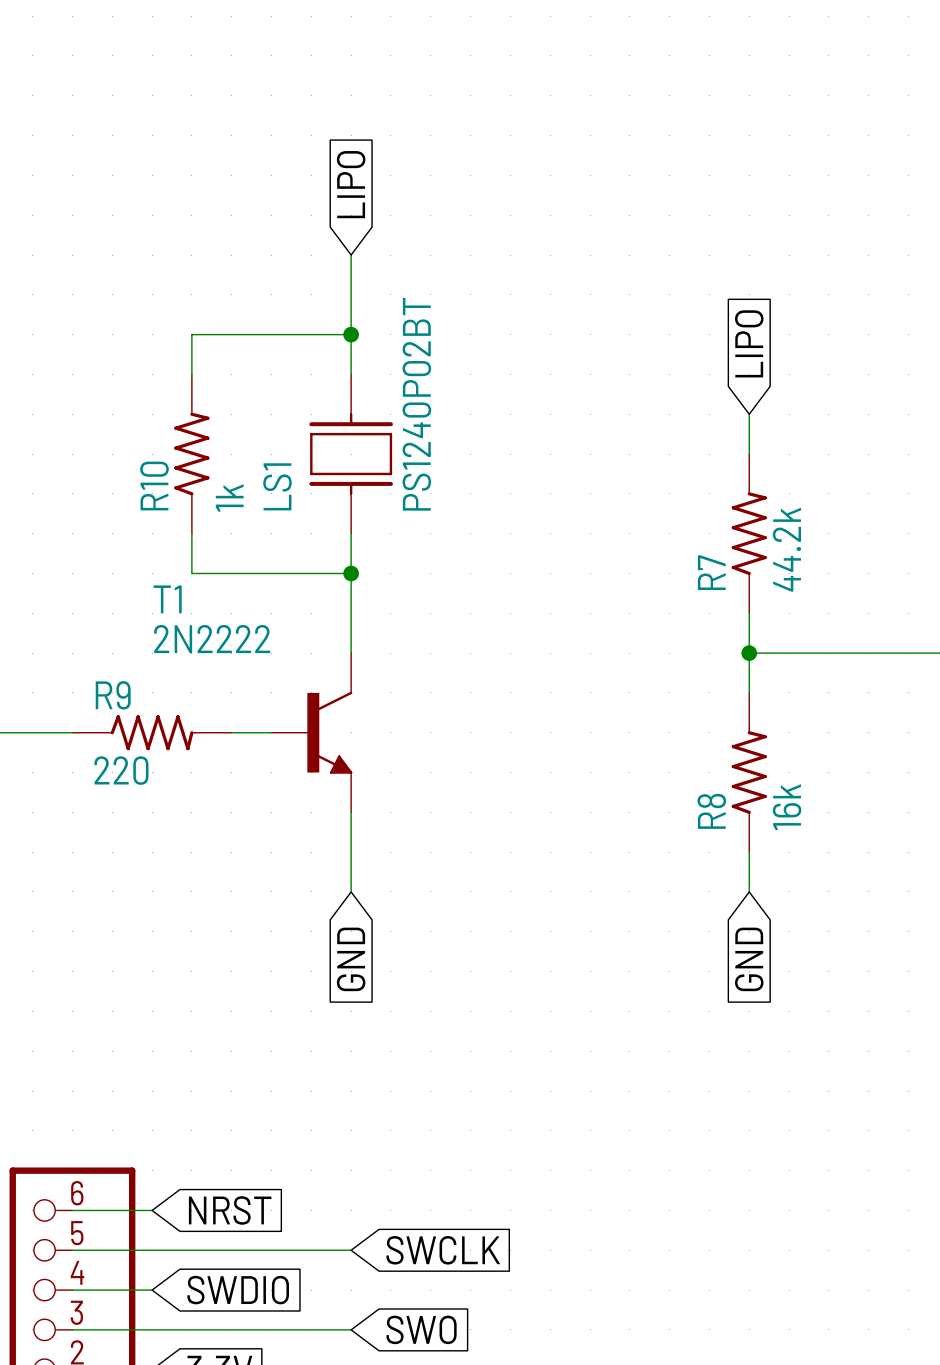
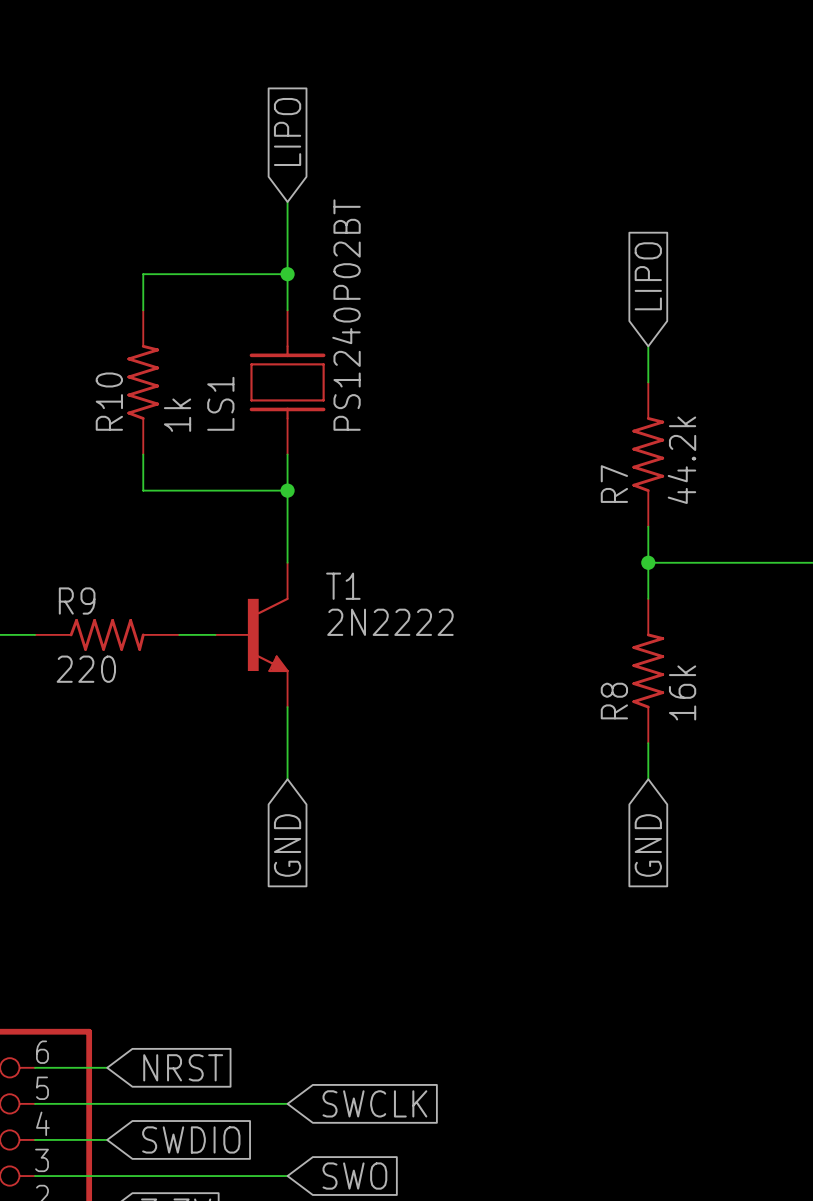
T1 name position: T1 (167, 599) -> T1 (343, 586)
T1 value position: 2N2222 (212, 639) -> 2N2222 (390, 622)

